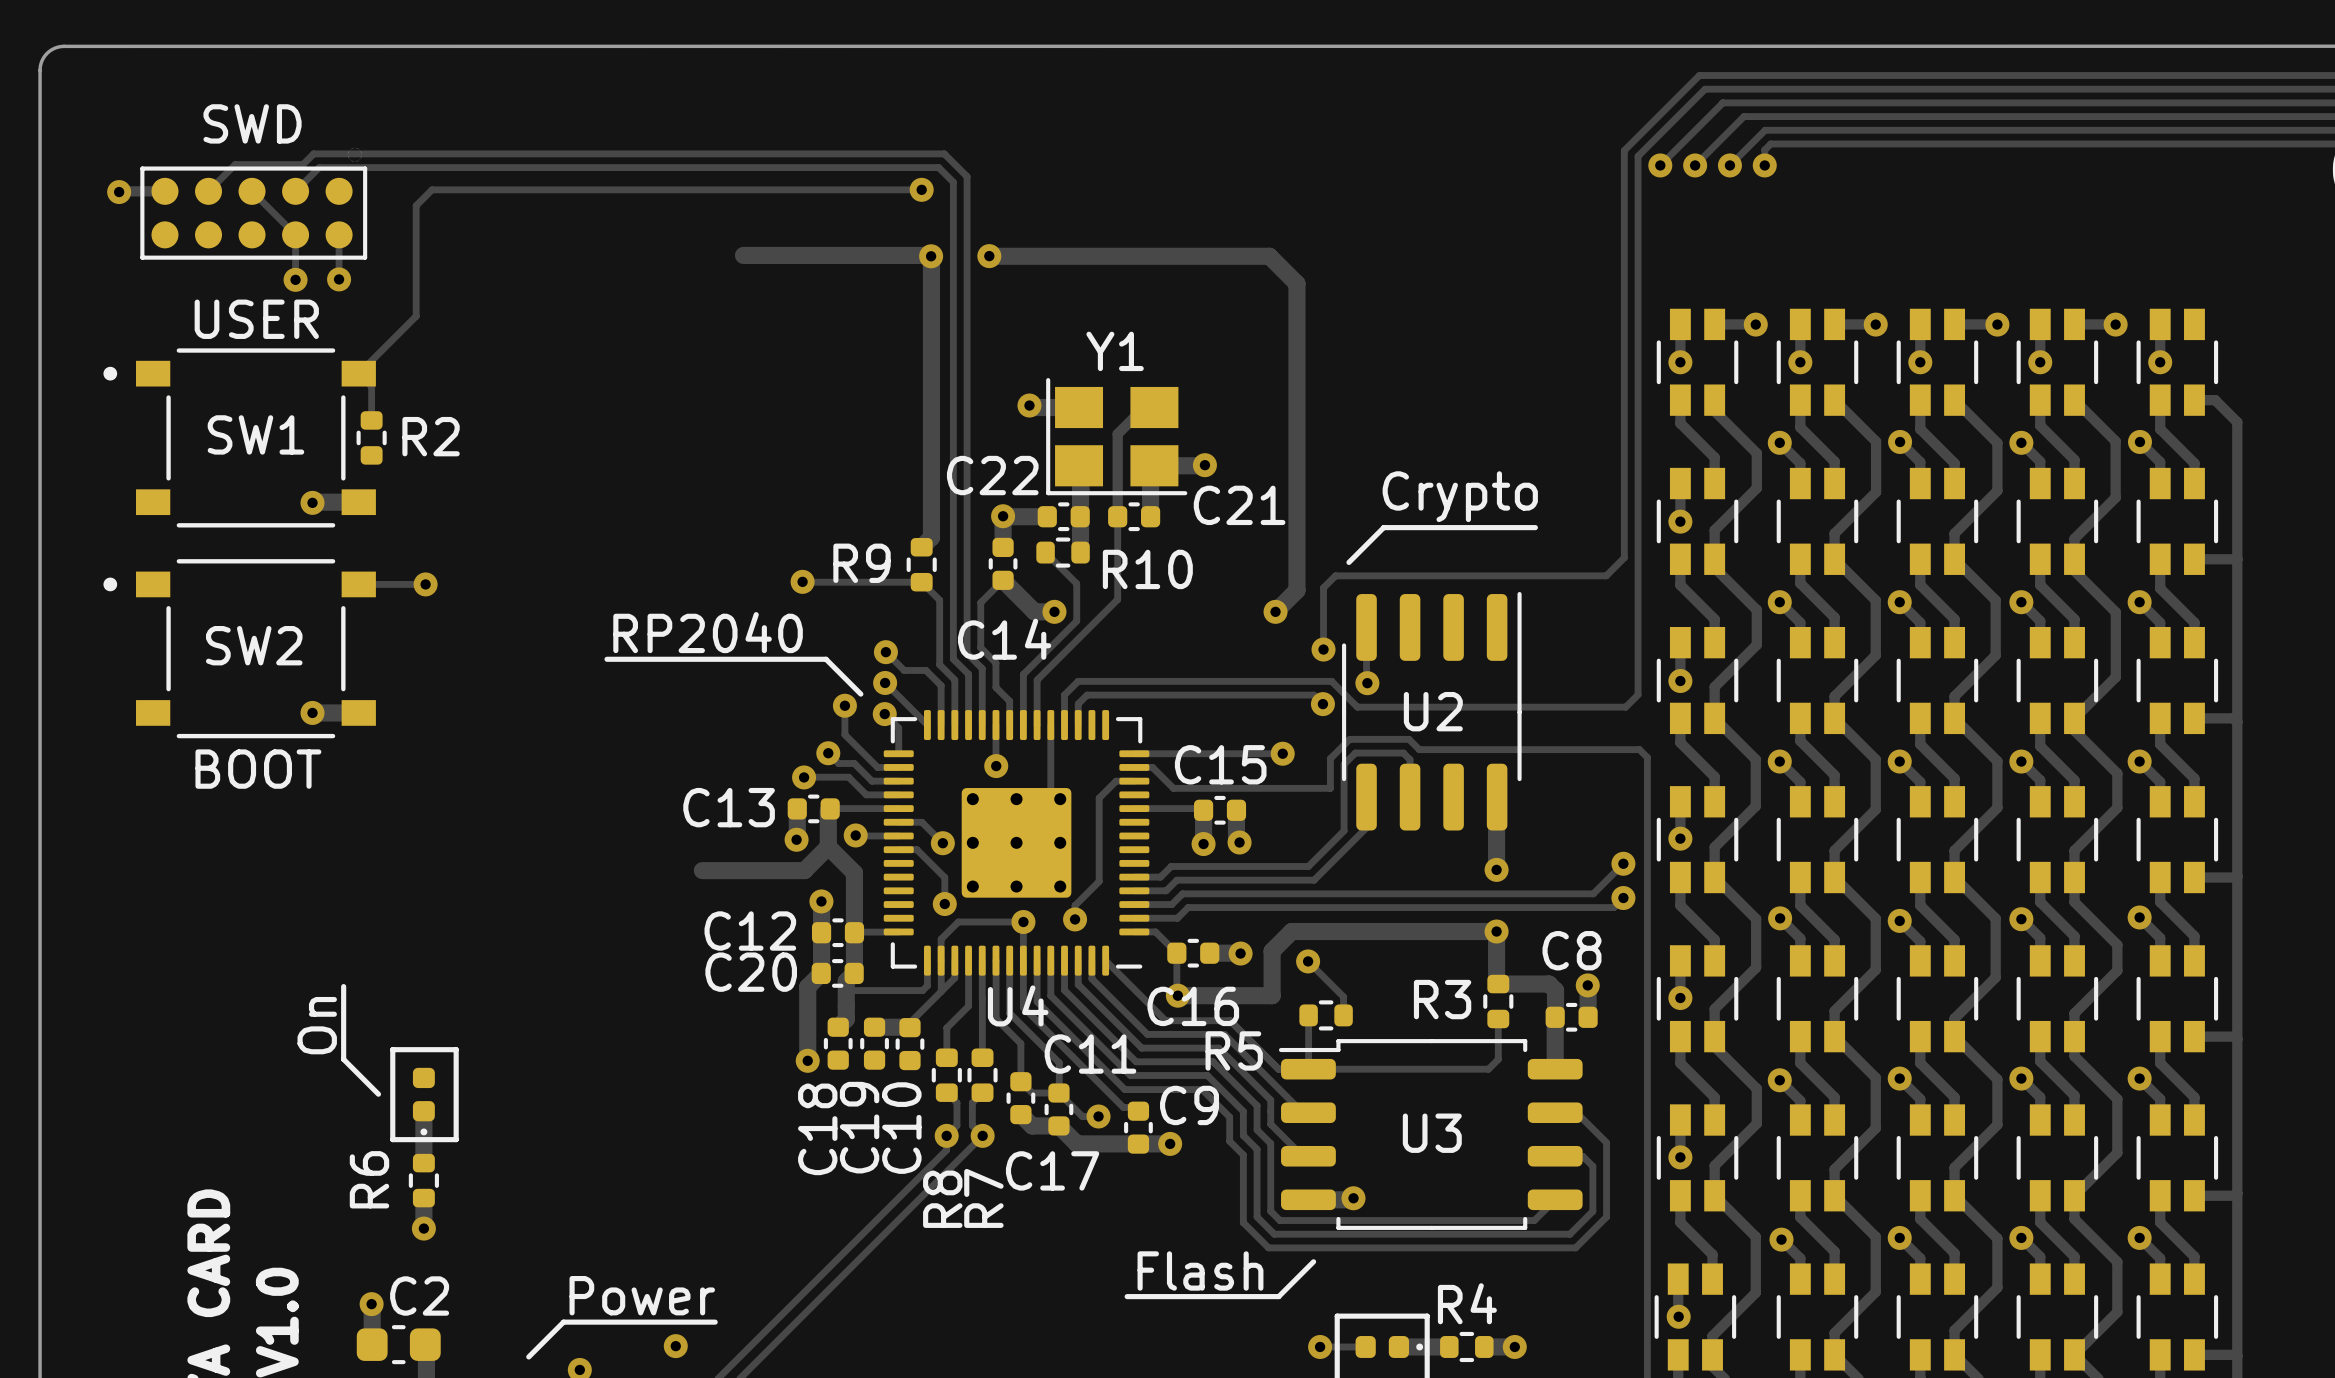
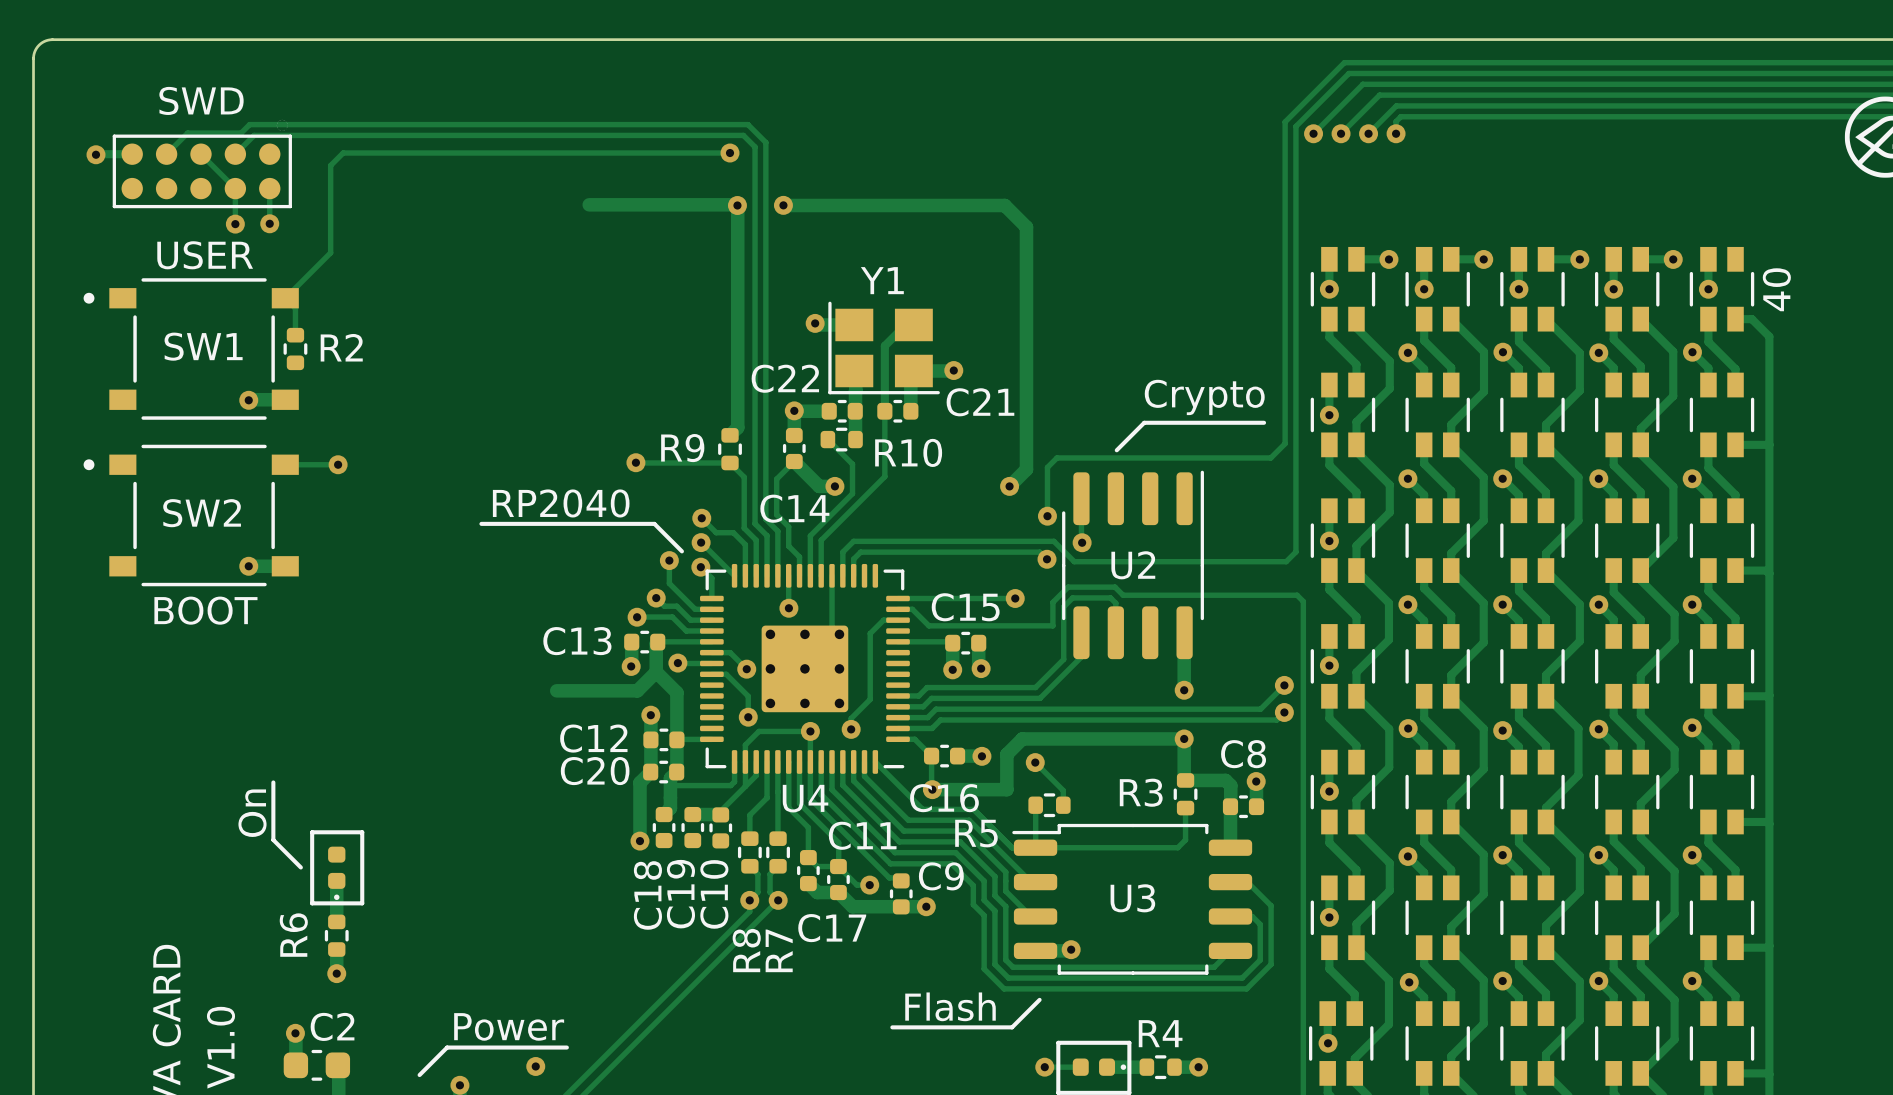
text: none -> 40 (1776, 289)
text position: Crypto (1460, 496) -> Crypto (1204, 397)
line: (1535, 527) (1383, 527) (1348, 562) -> (1264, 422) (1144, 422) (1116, 450)

